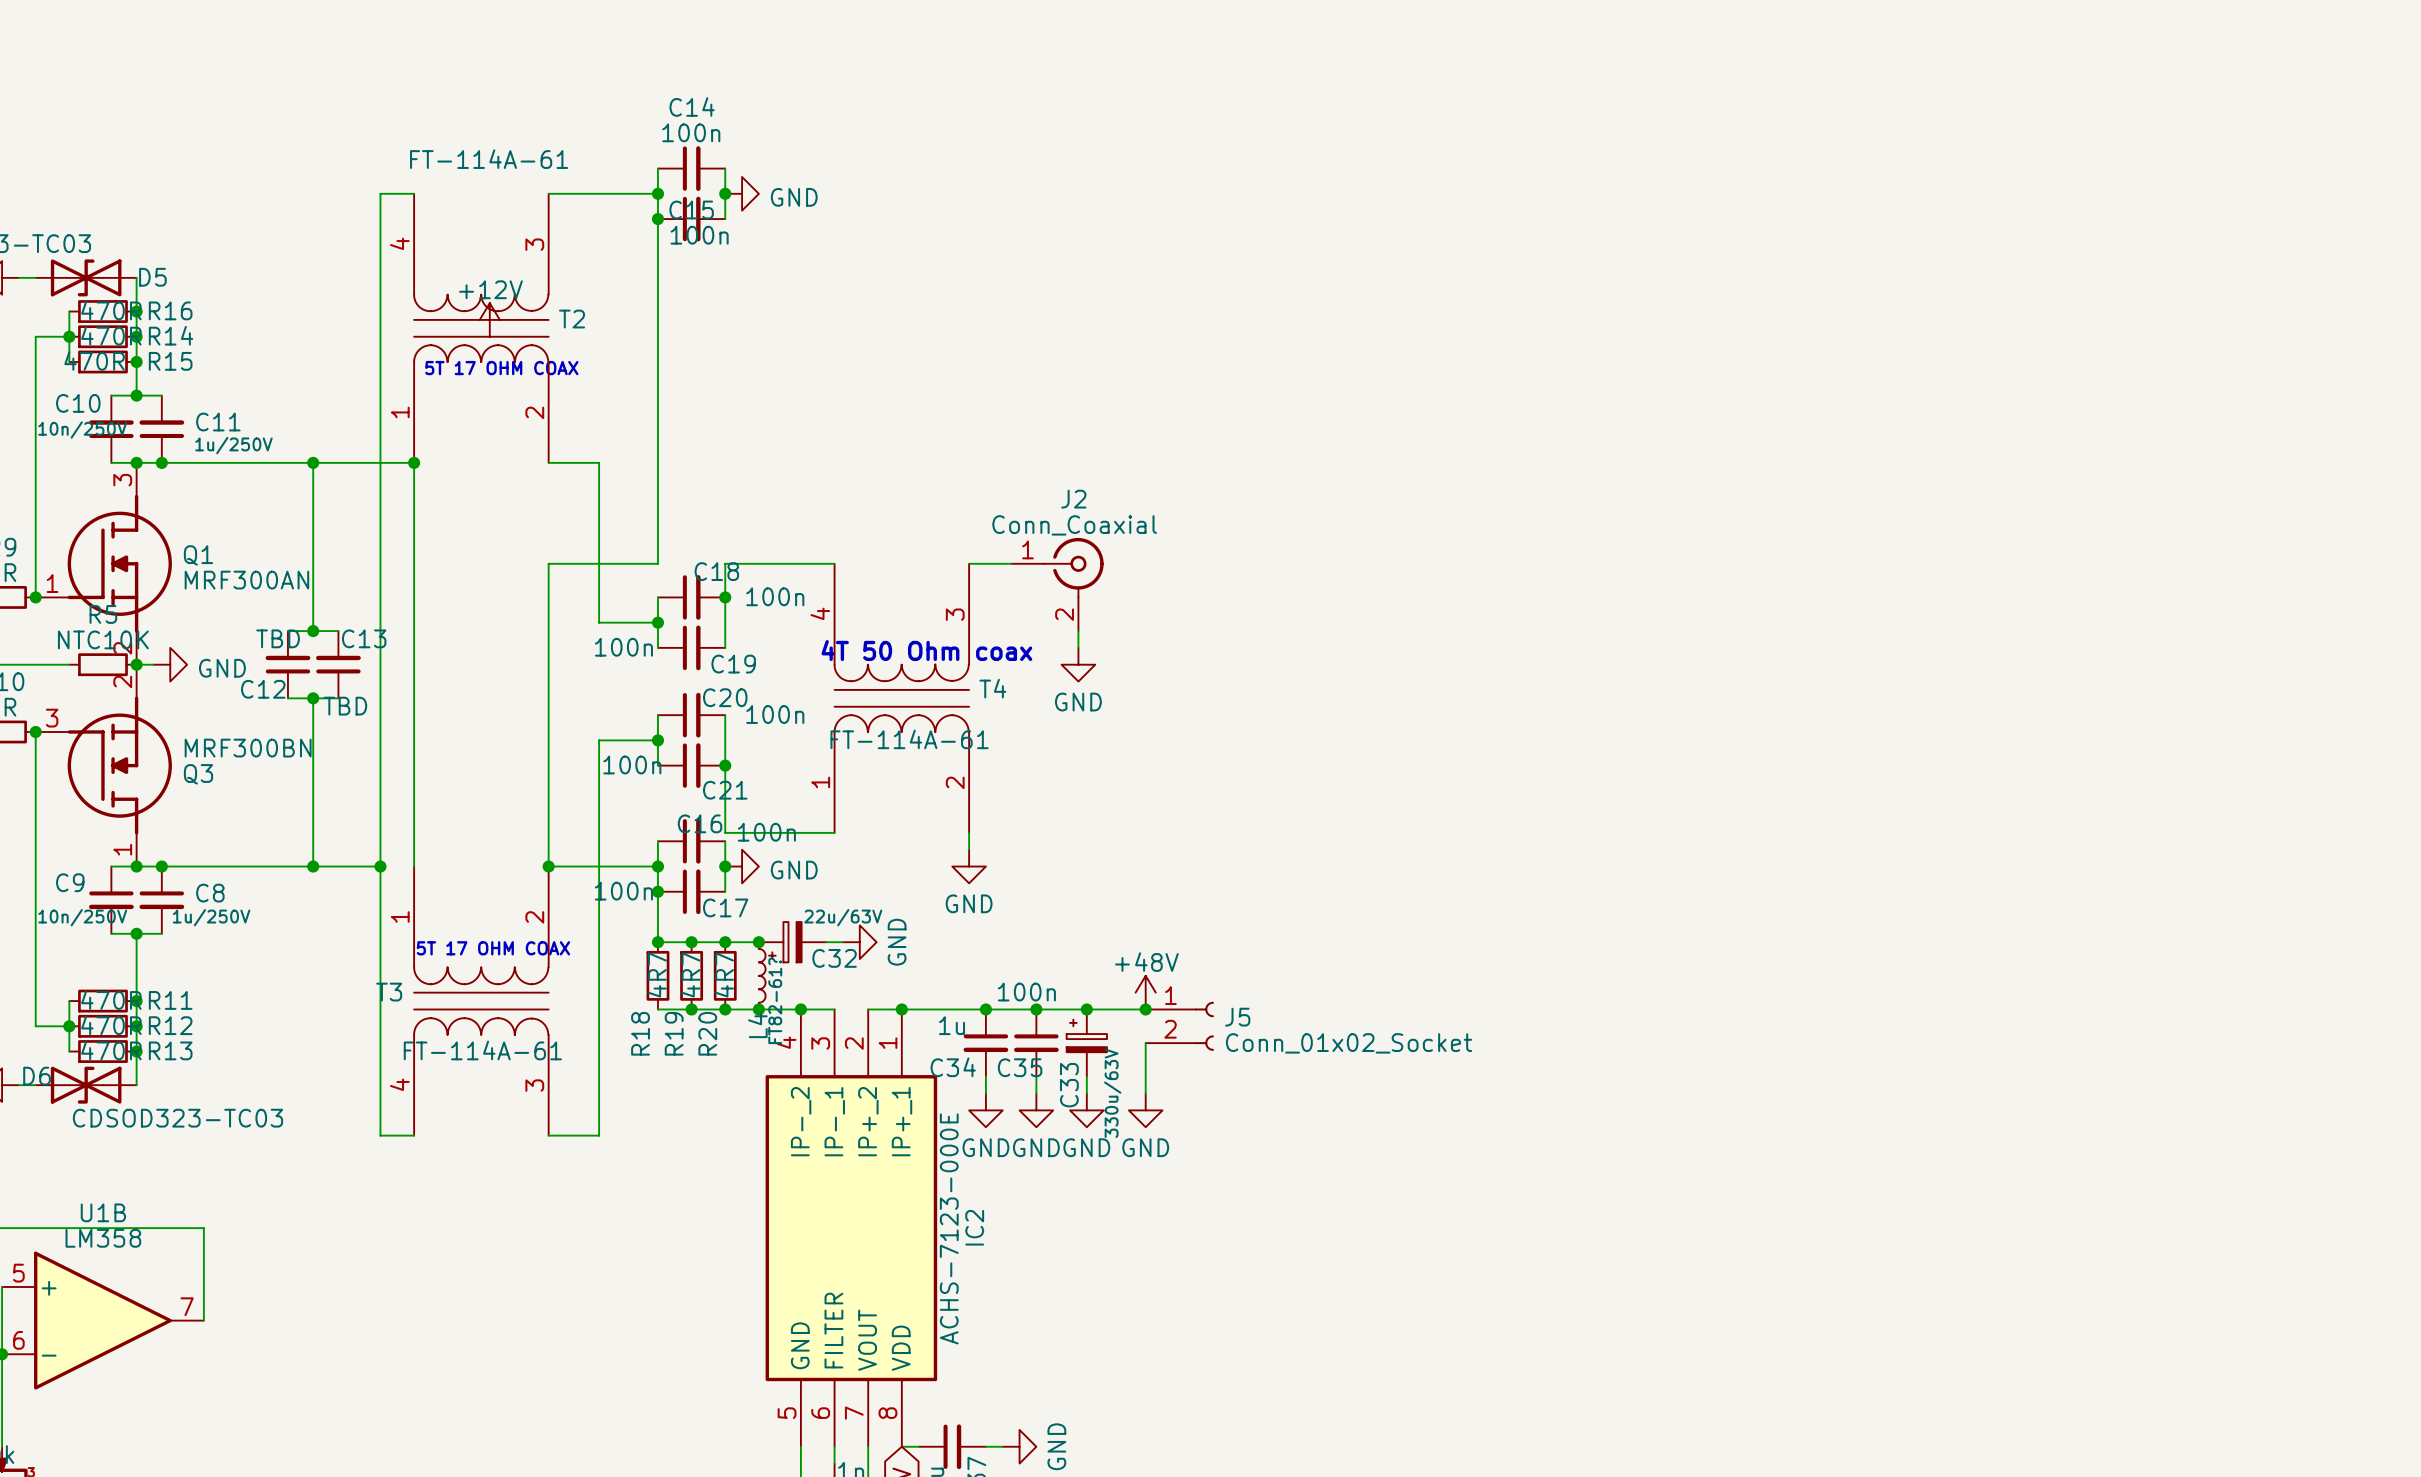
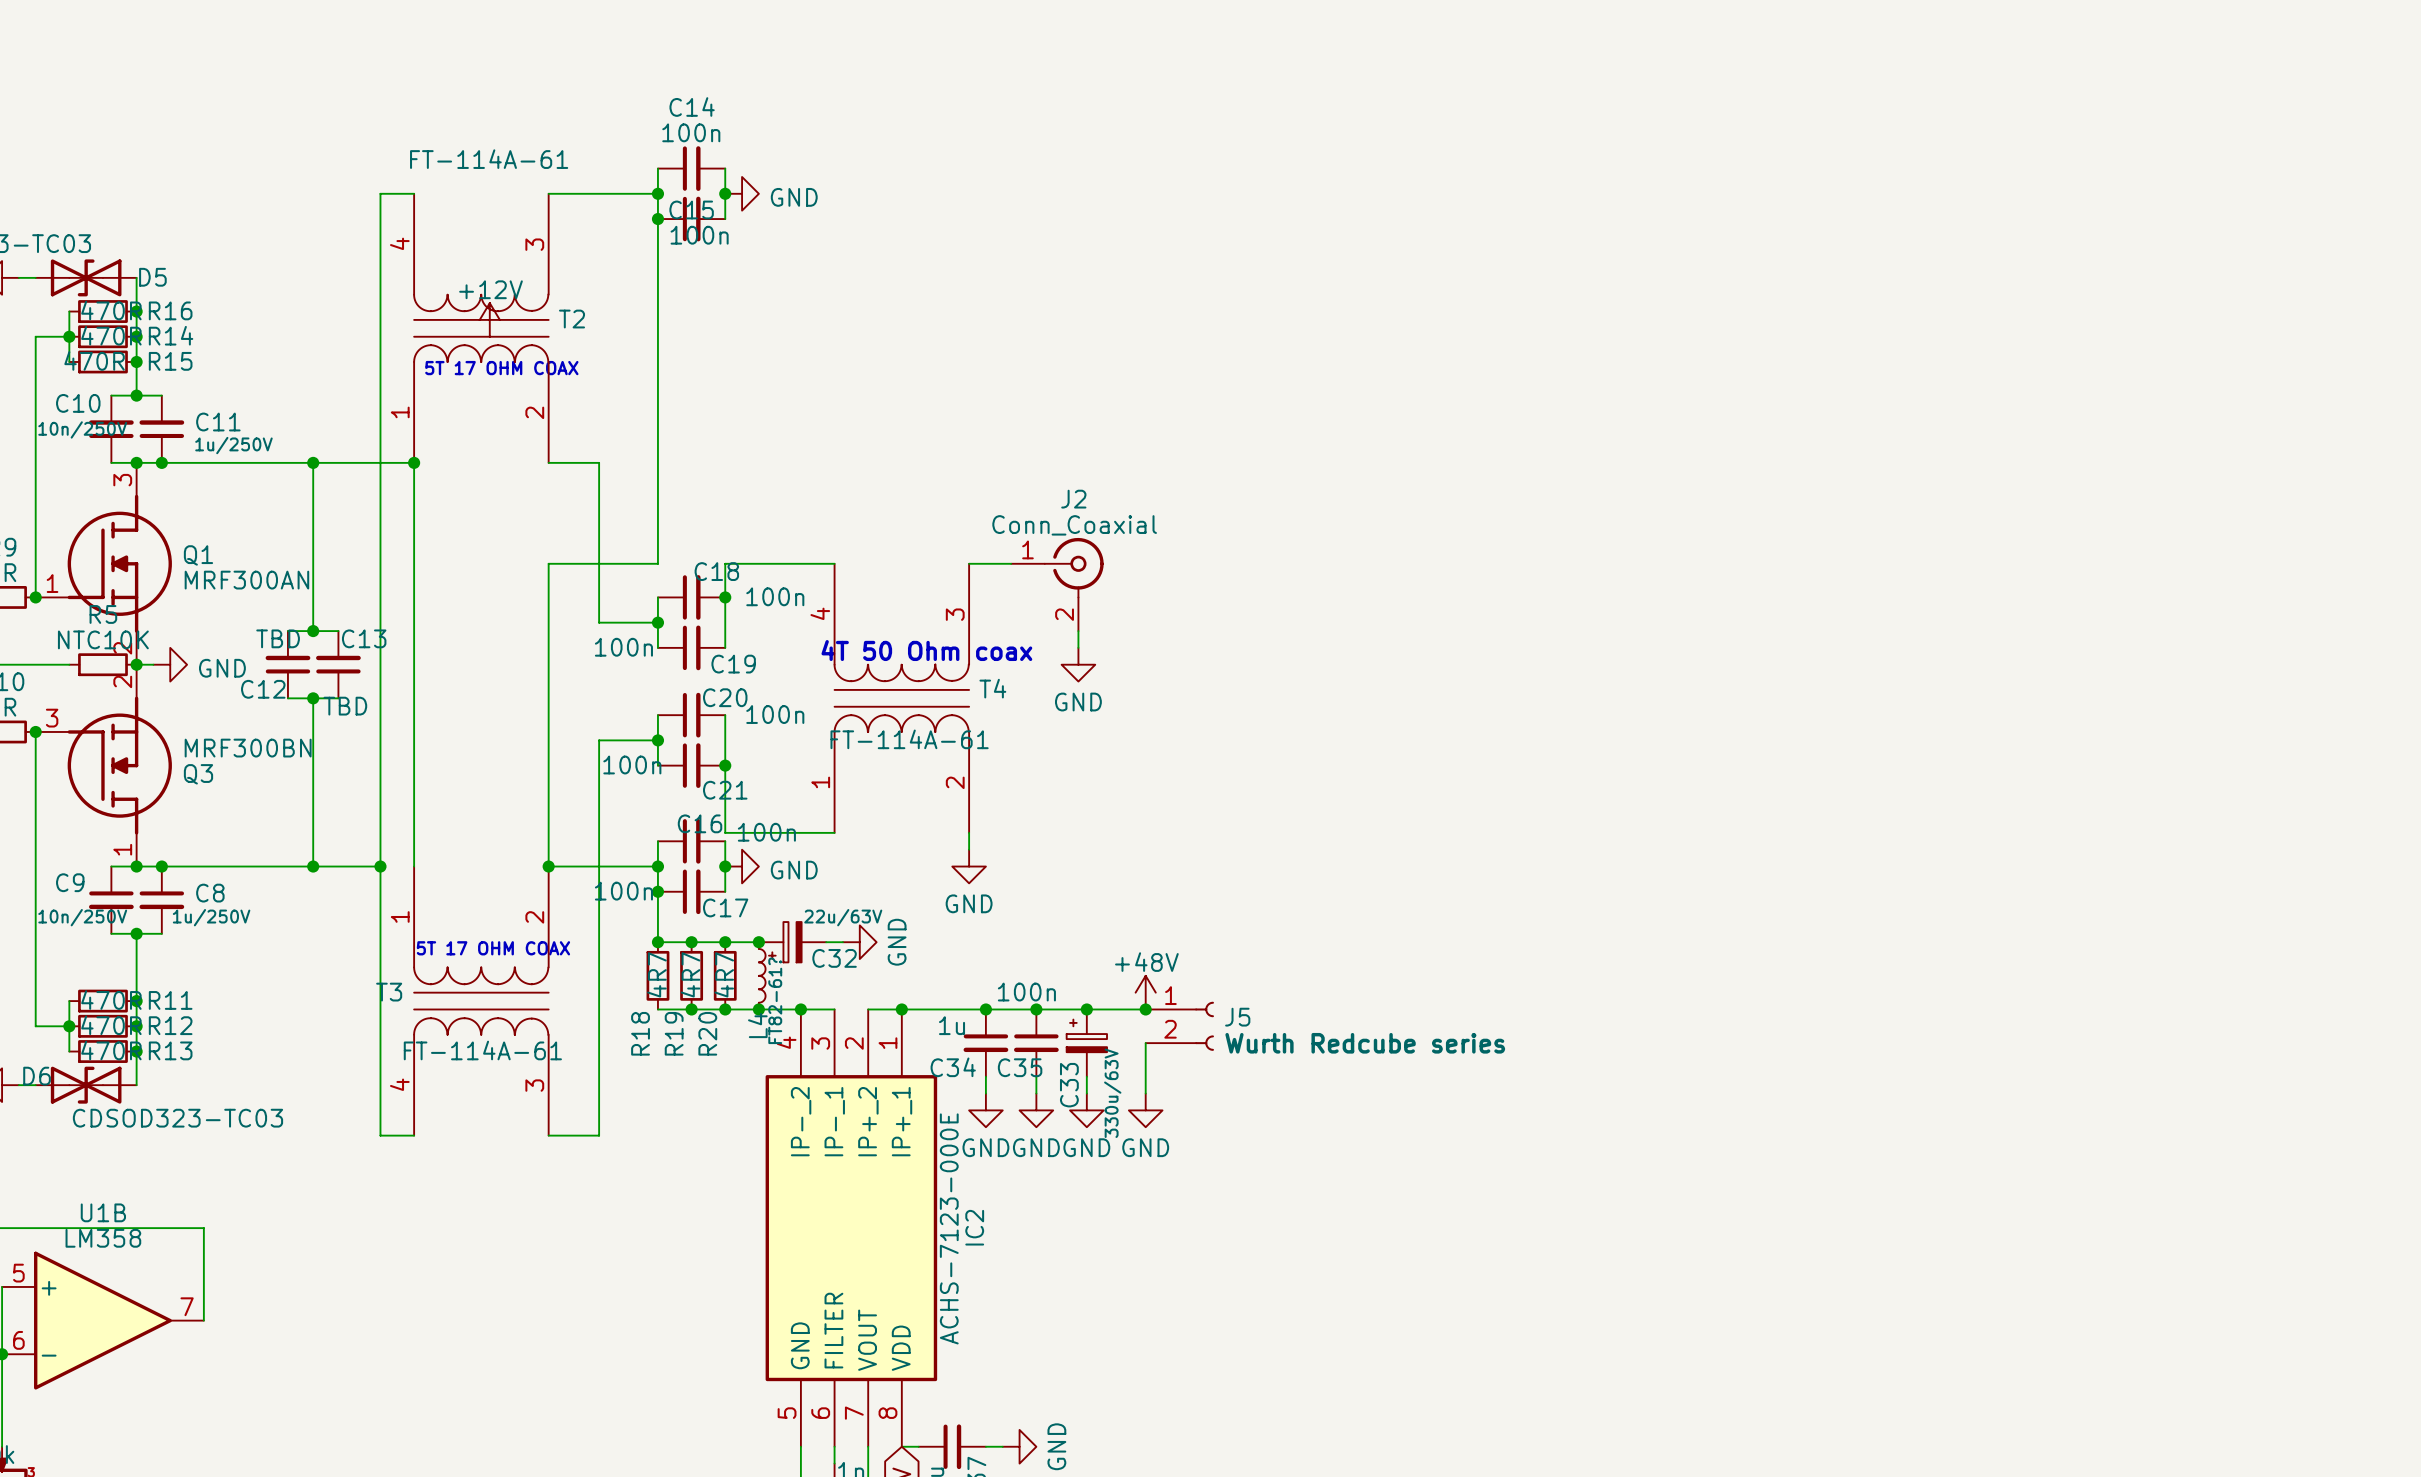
J5 value: Conn_01x02_Socket (1349, 1043) -> Wurth Redcube series (1365, 1043)

